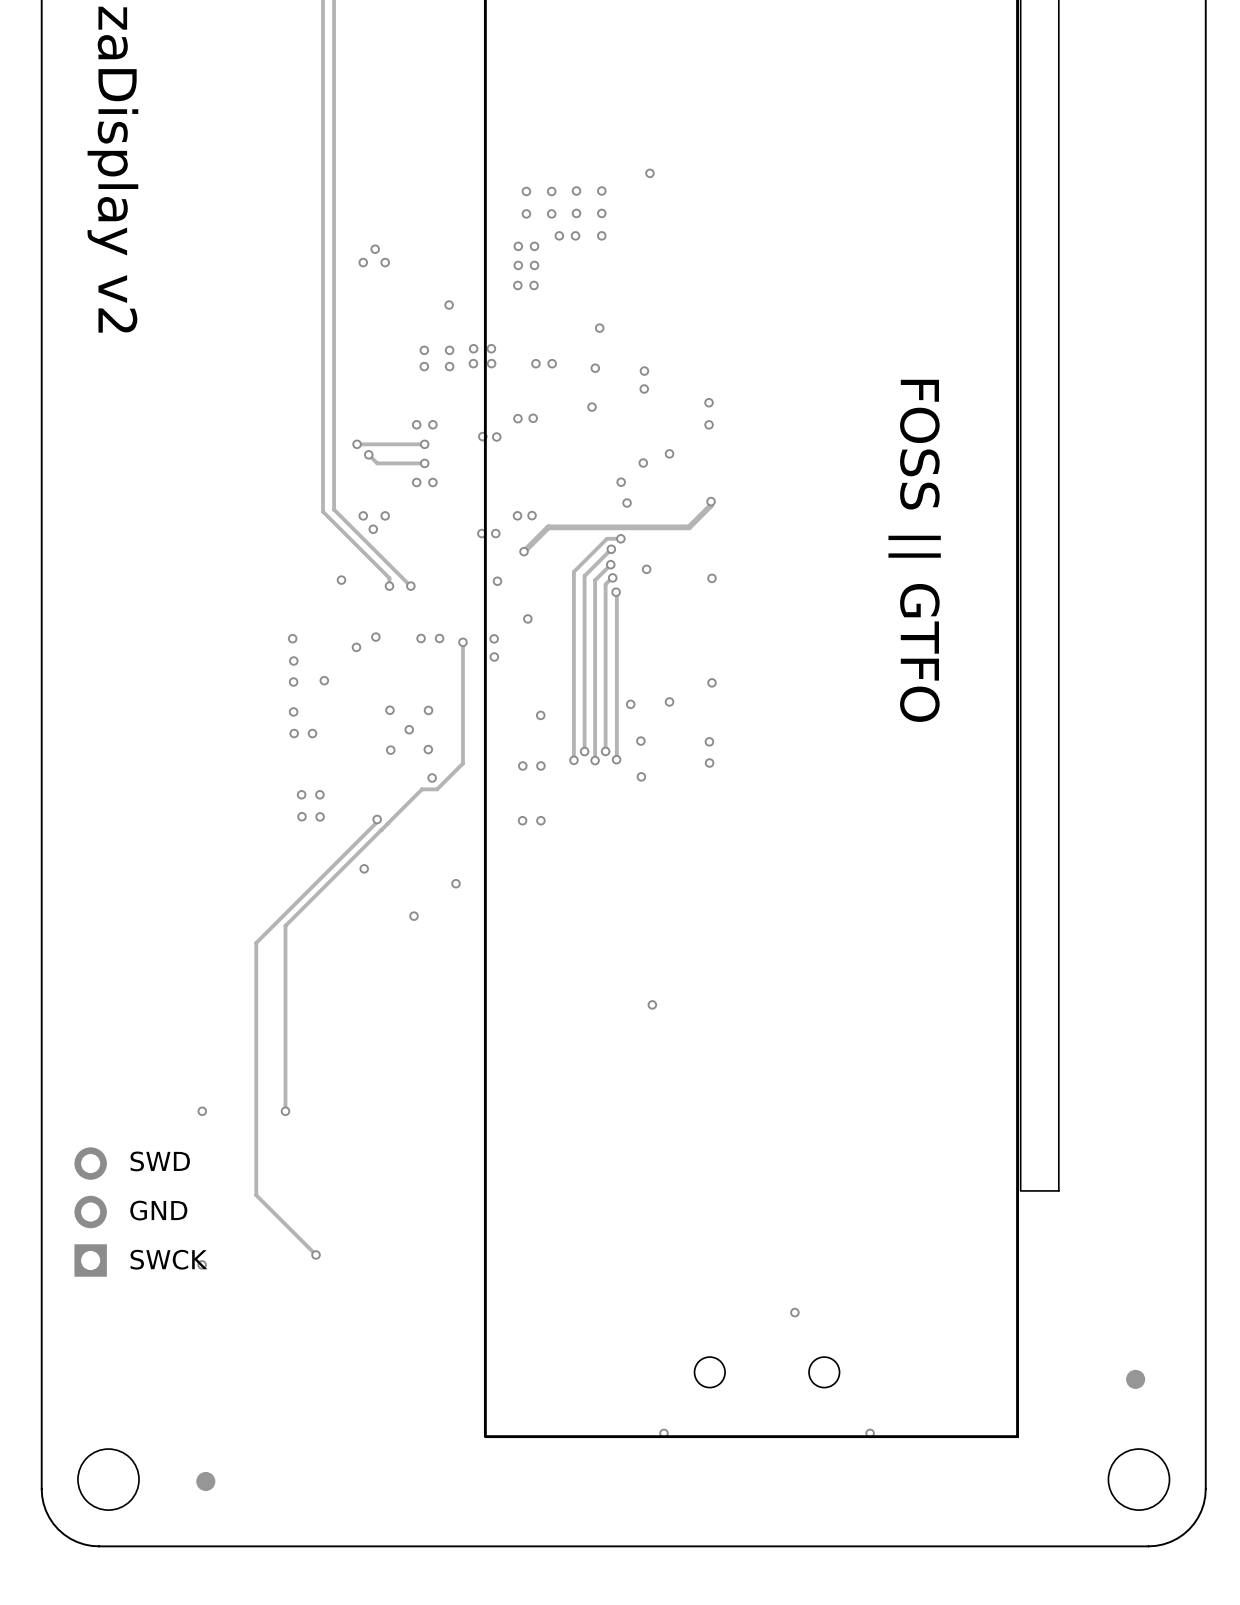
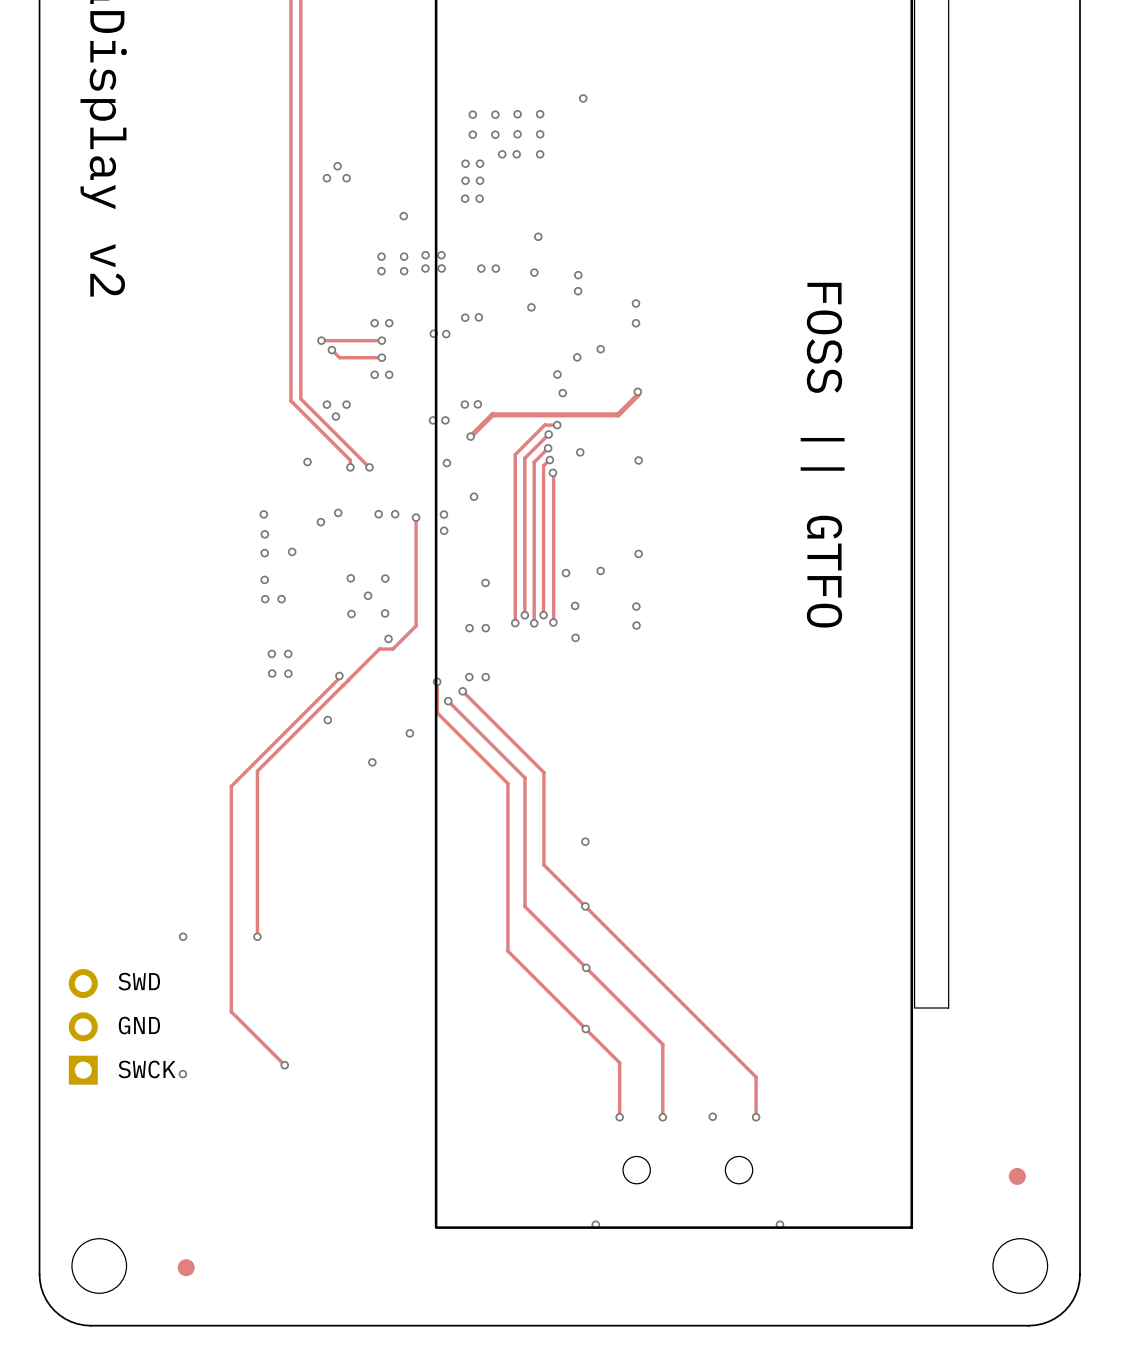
track: none -> (437, 682) (437, 713) (507, 783) (507, 951) (619, 1062) (619, 1117)
via: none -> (437, 681)
track: none -> (462, 691) (543, 772) (543, 864) (756, 1077) (756, 1117)
via: none -> (462, 691)
track: none -> (448, 701) (524, 777) (524, 906) (662, 1044) (662, 1117)
via: none -> (448, 701)
via: none -> (585, 906)
via: none -> (586, 967)
via: none -> (585, 1028)
via: none -> (619, 1117)
via: none -> (662, 1117)
via: none -> (756, 1117)

